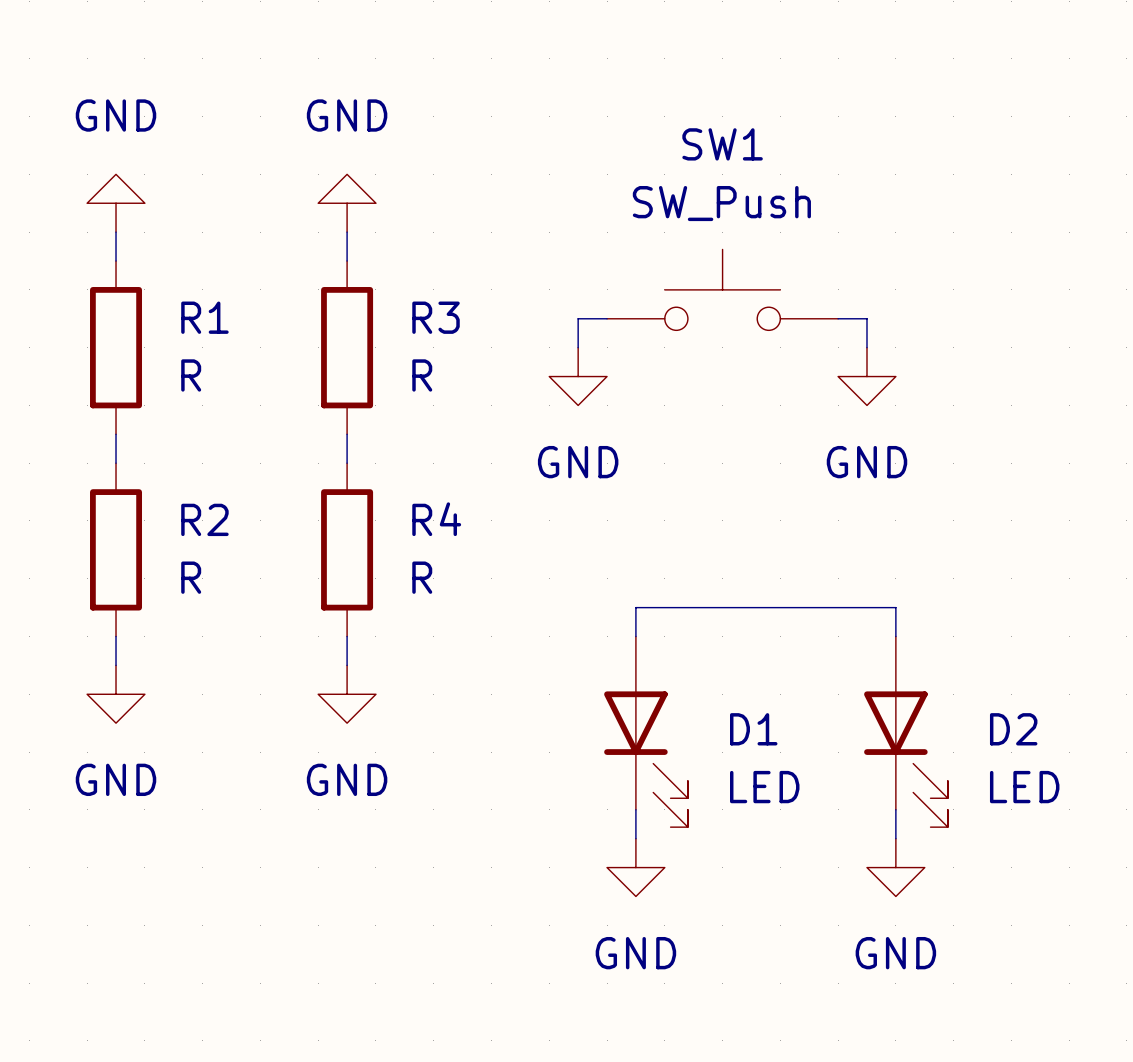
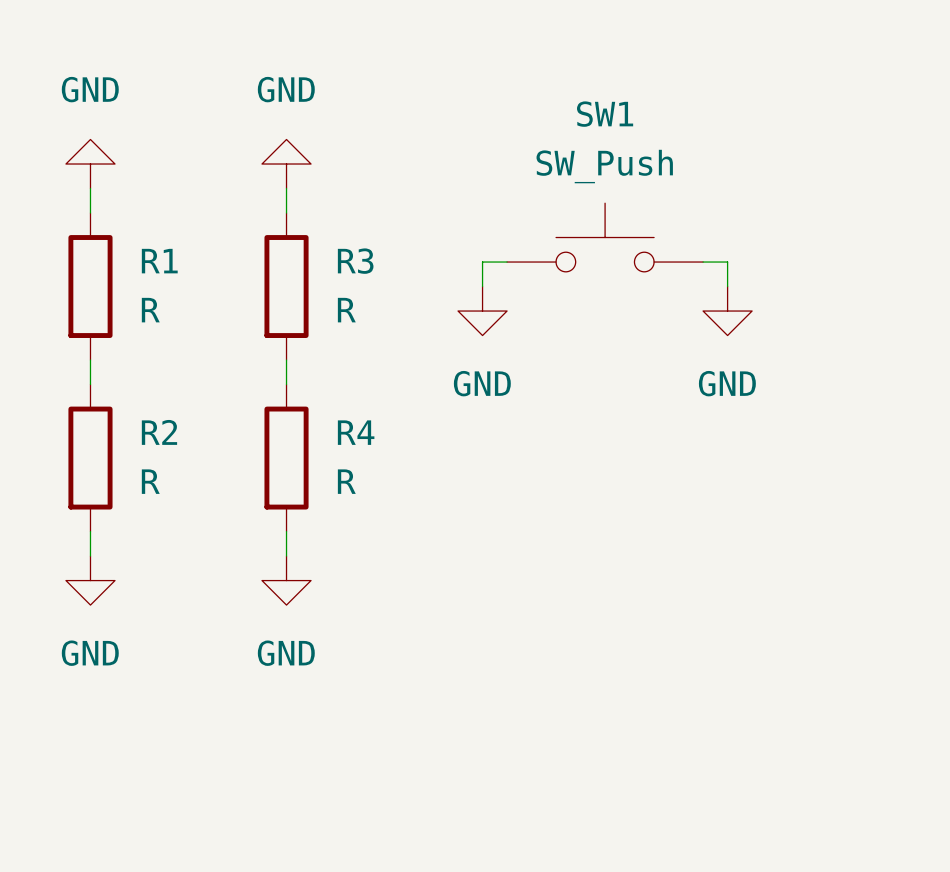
wire: (635, 636) (635, 607) (895, 607) (895, 636) -> none
D1: LED (646, 731) -> none
D2: LED (905, 731) -> none
wire: (635, 809) (635, 838) -> none
wire: (895, 809) (895, 838) -> none
power symbol: GND (635, 867) -> none
power symbol: GND (895, 867) -> none

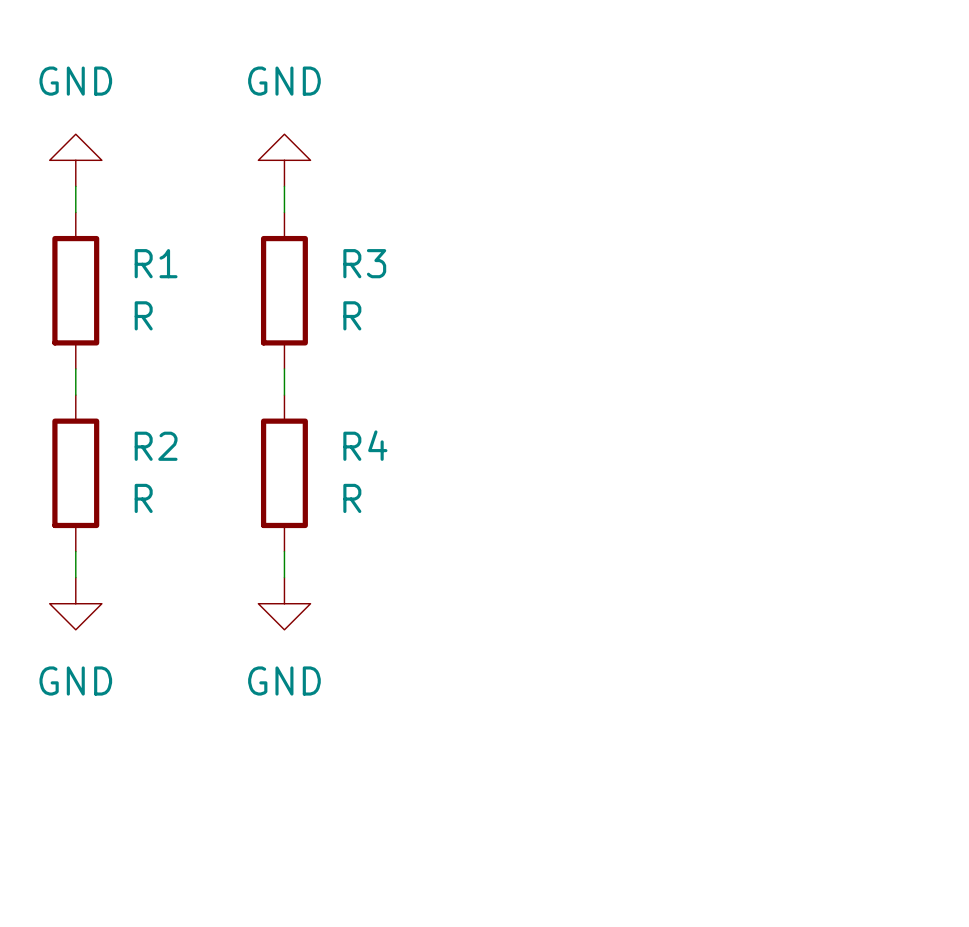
SW1: SW_Push (605, 237) -> none
wire: (507, 262) (482, 262) (482, 286) -> none
wire: (703, 262) (727, 262) (727, 286) -> none
power symbol: GND (482, 311) -> none
power symbol: GND (727, 311) -> none

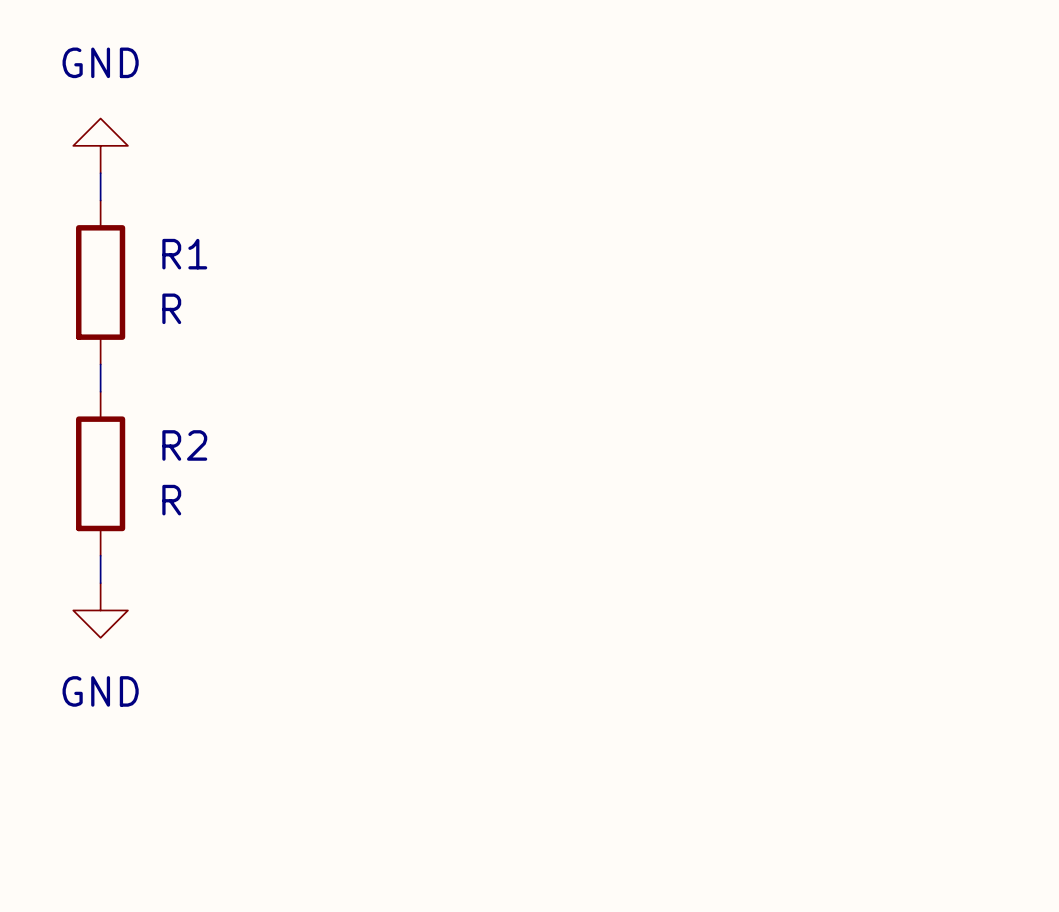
power symbol: GND (284, 160) -> none
wire: (284, 186) (284, 212) -> none
R3: R (284, 290) -> none
wire: (284, 368) (284, 395) -> none
R4: R (284, 473) -> none
wire: (284, 551) (284, 577) -> none
power symbol: GND (284, 603) -> none

